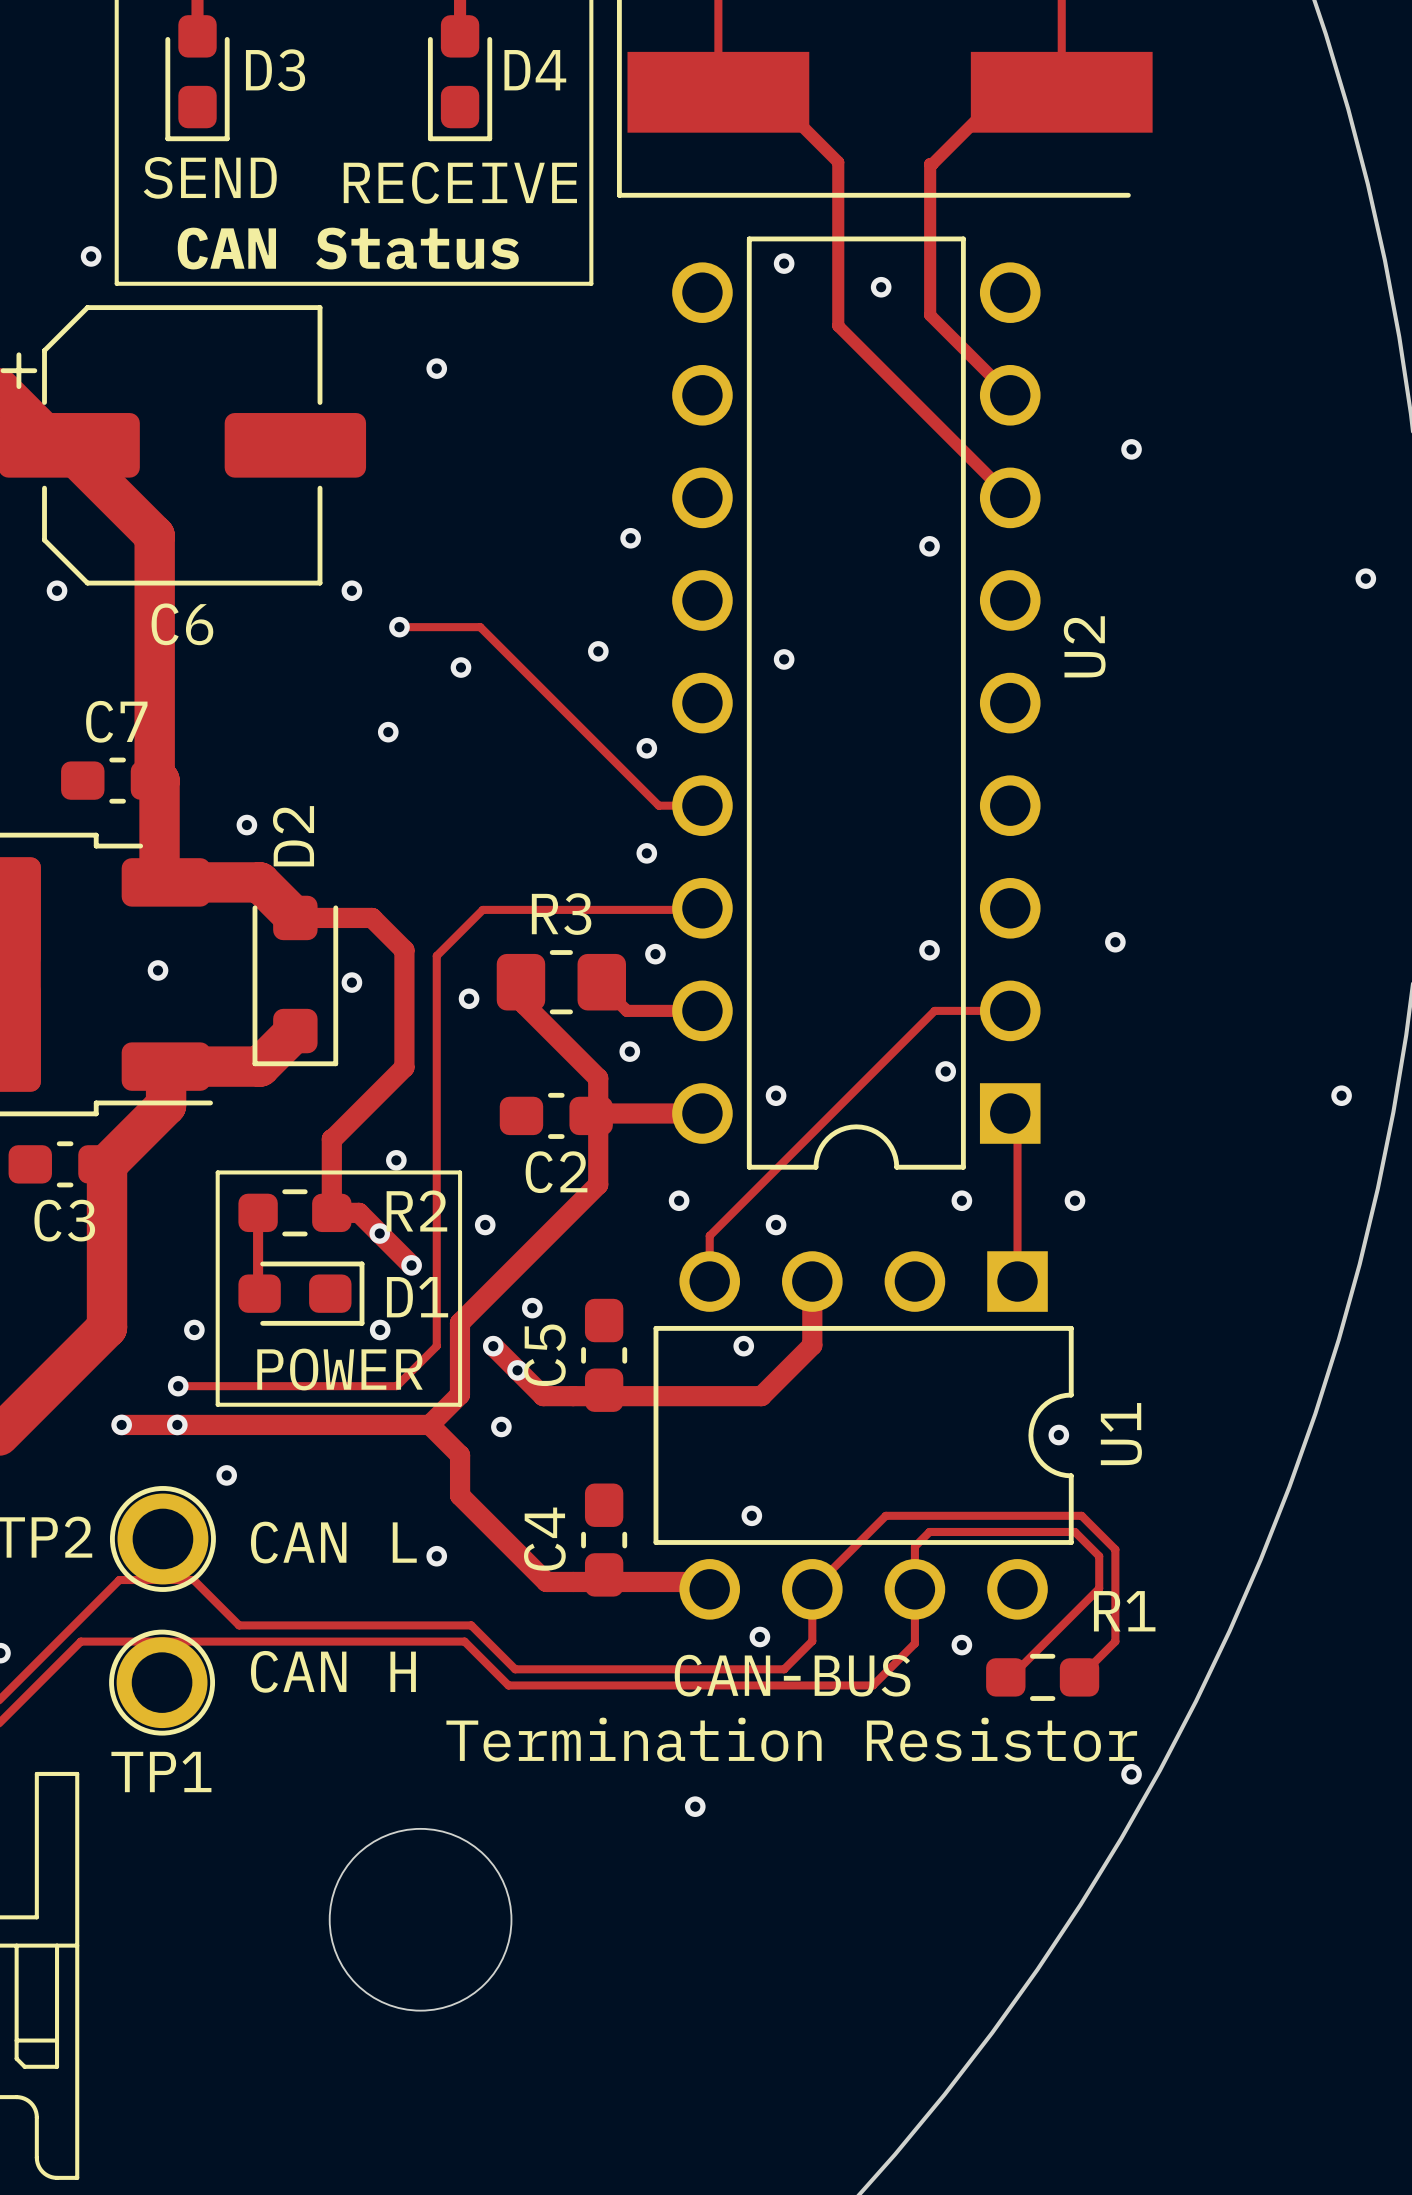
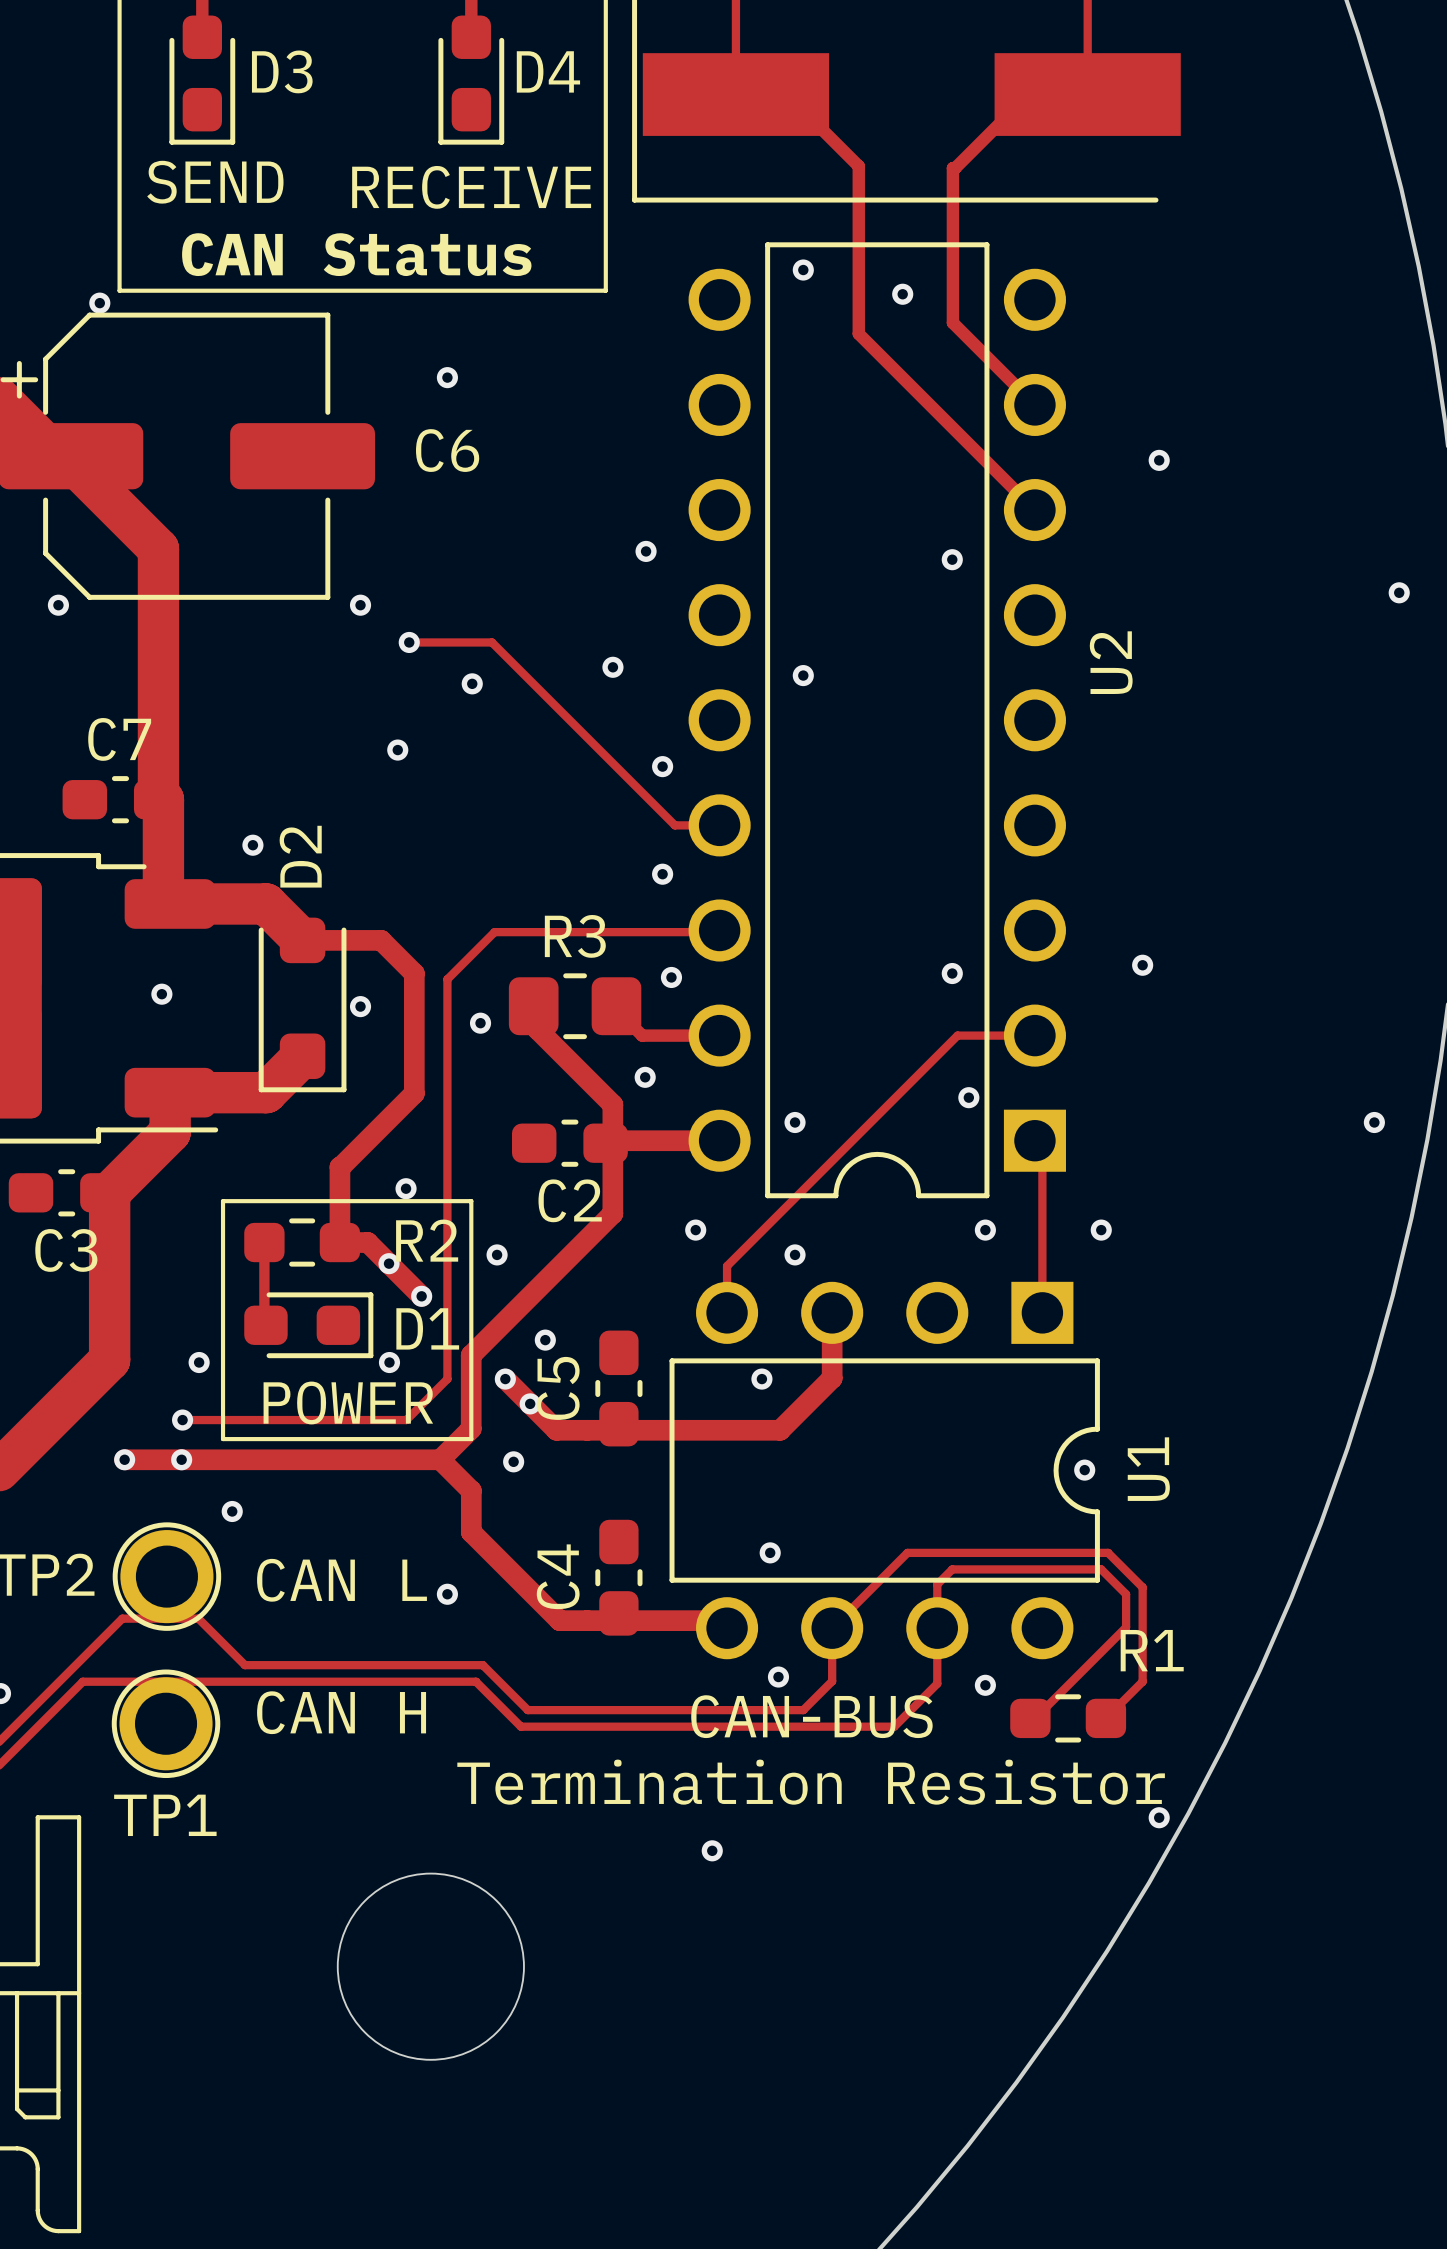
via position: (91, 256) -> (99, 303)
C6 name position: C6 (182, 624) -> C6 (447, 450)

